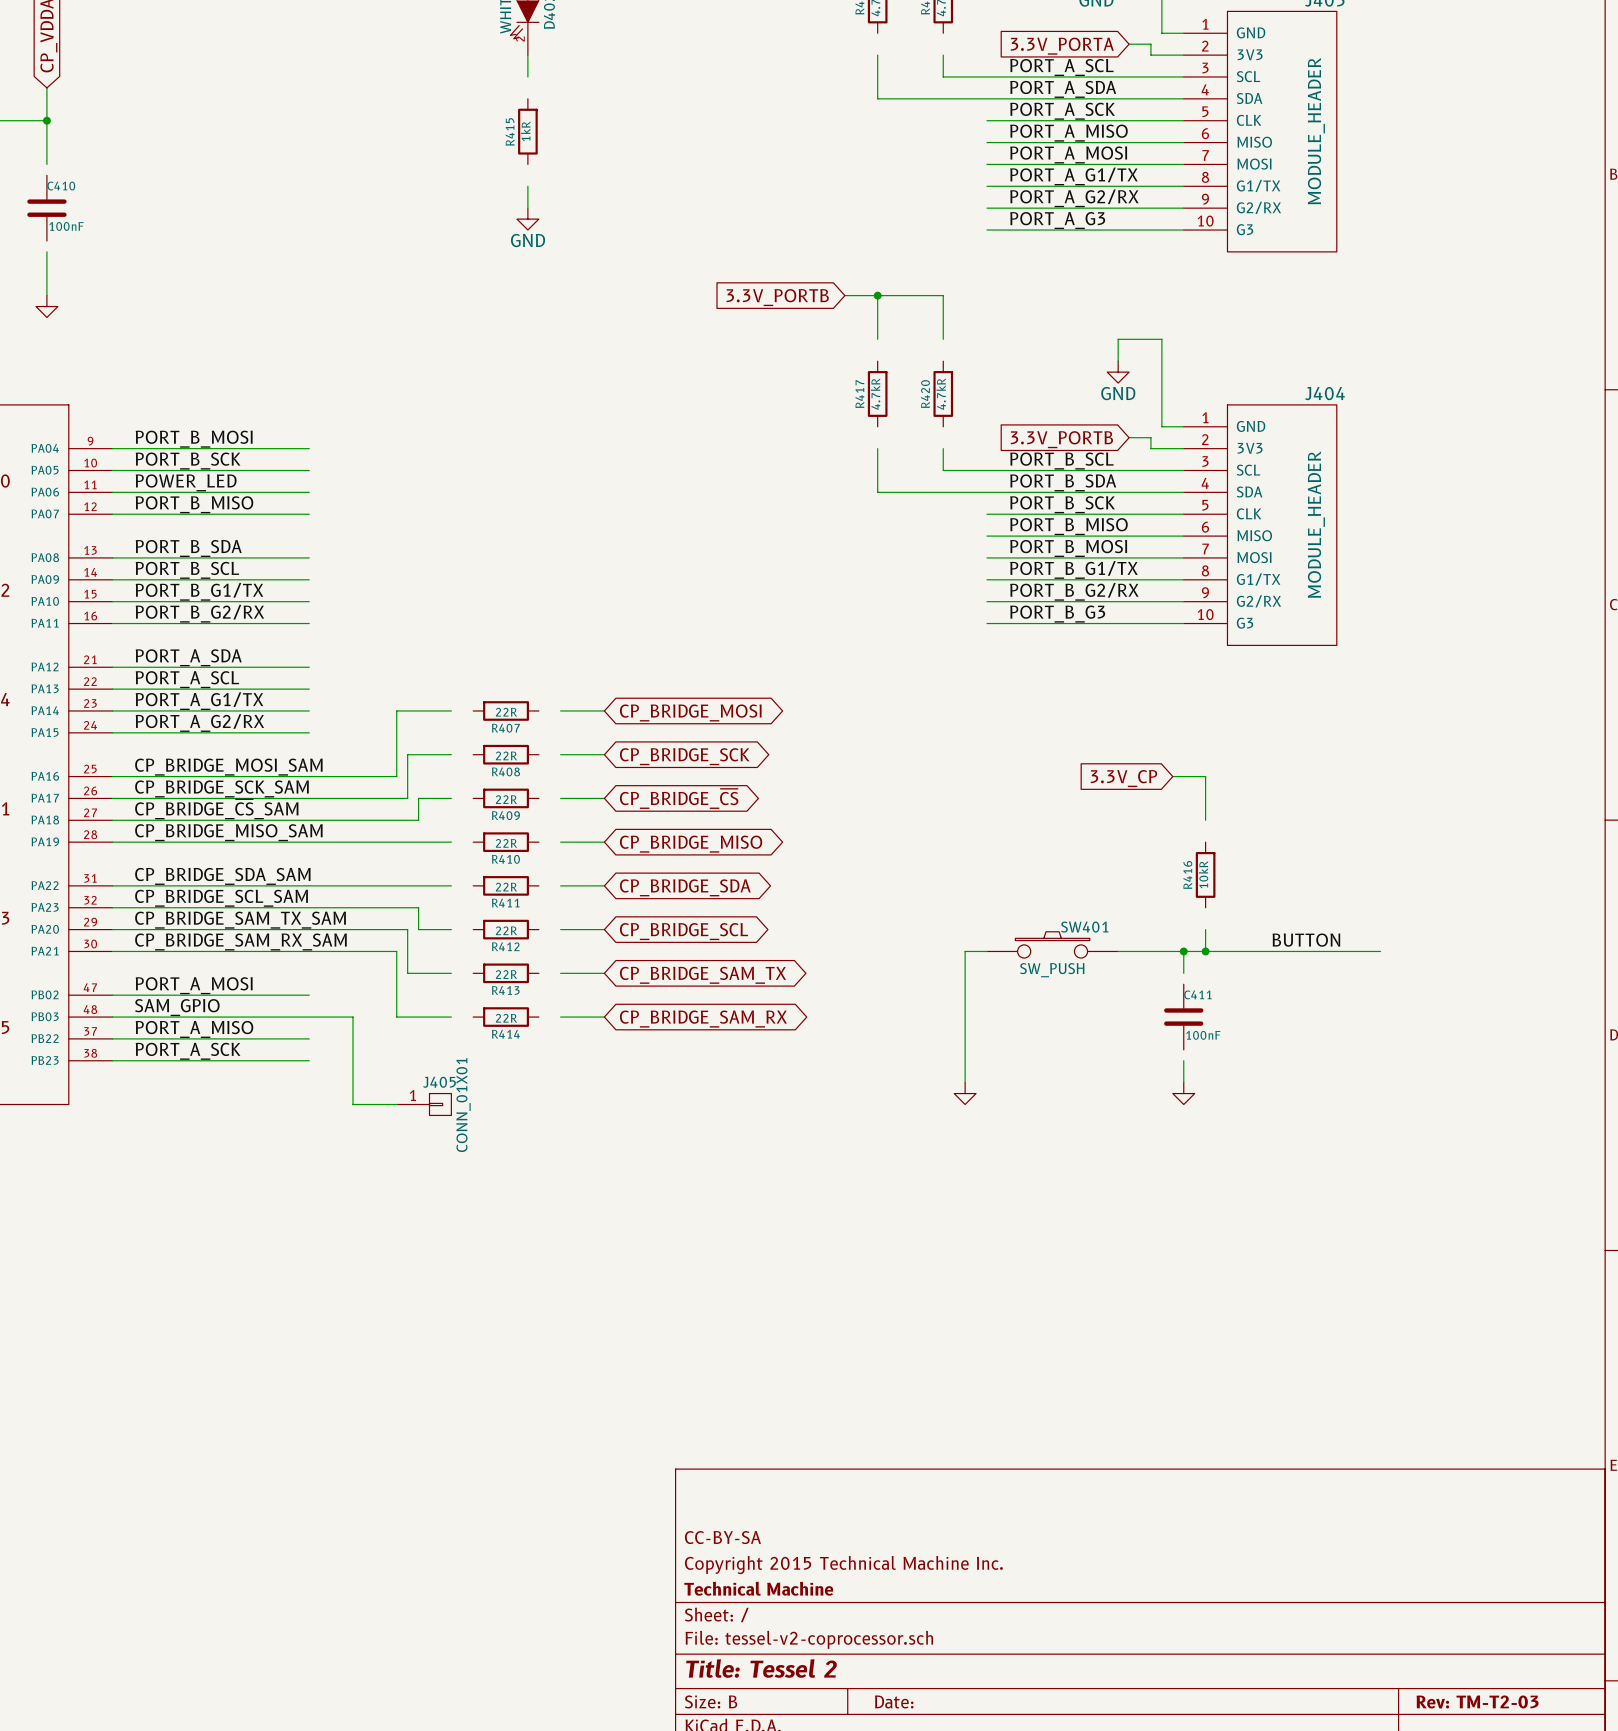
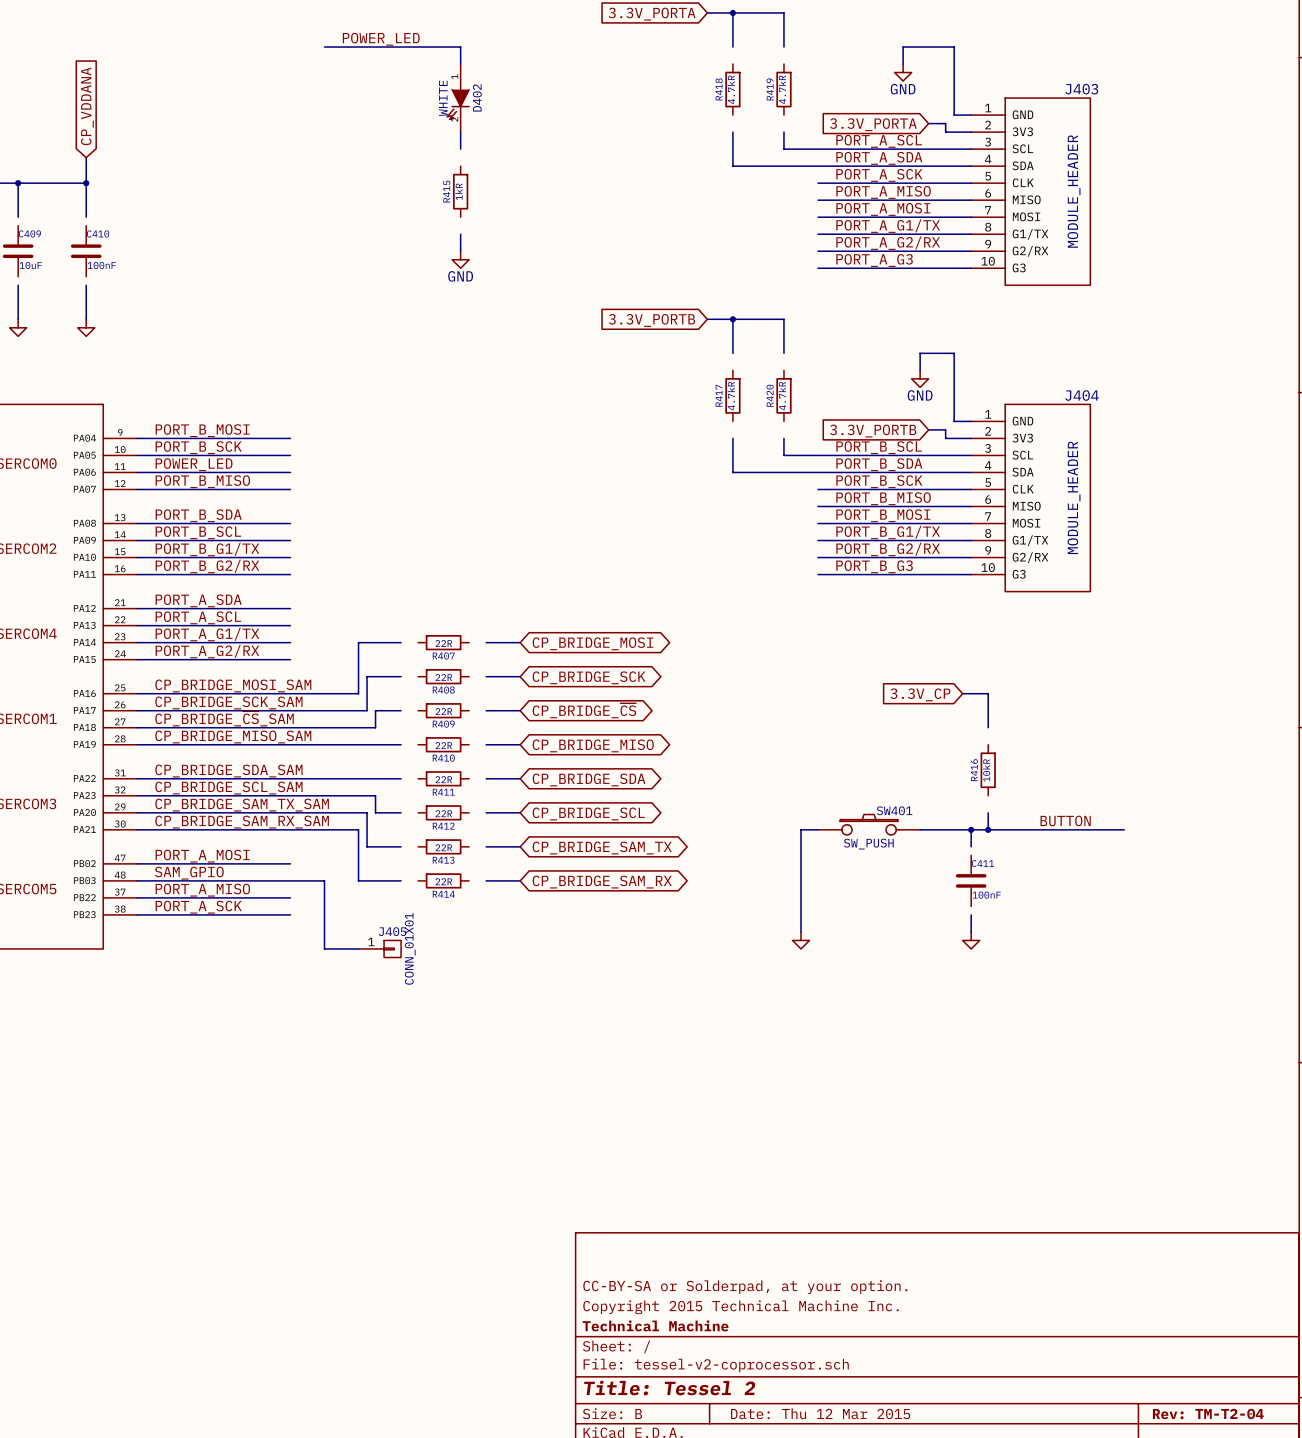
title block: CC-BY-SA (722, 1537) -> CC-BY-SA or Solderpad, at your option. (745, 1287)
title block: Date: (894, 1701) -> Date: Thu 12 Mar 2015 (820, 1413)
title block: Rev: TM-T2-03 (1477, 1701) -> Rev: TM-T2-04 (1208, 1413)

